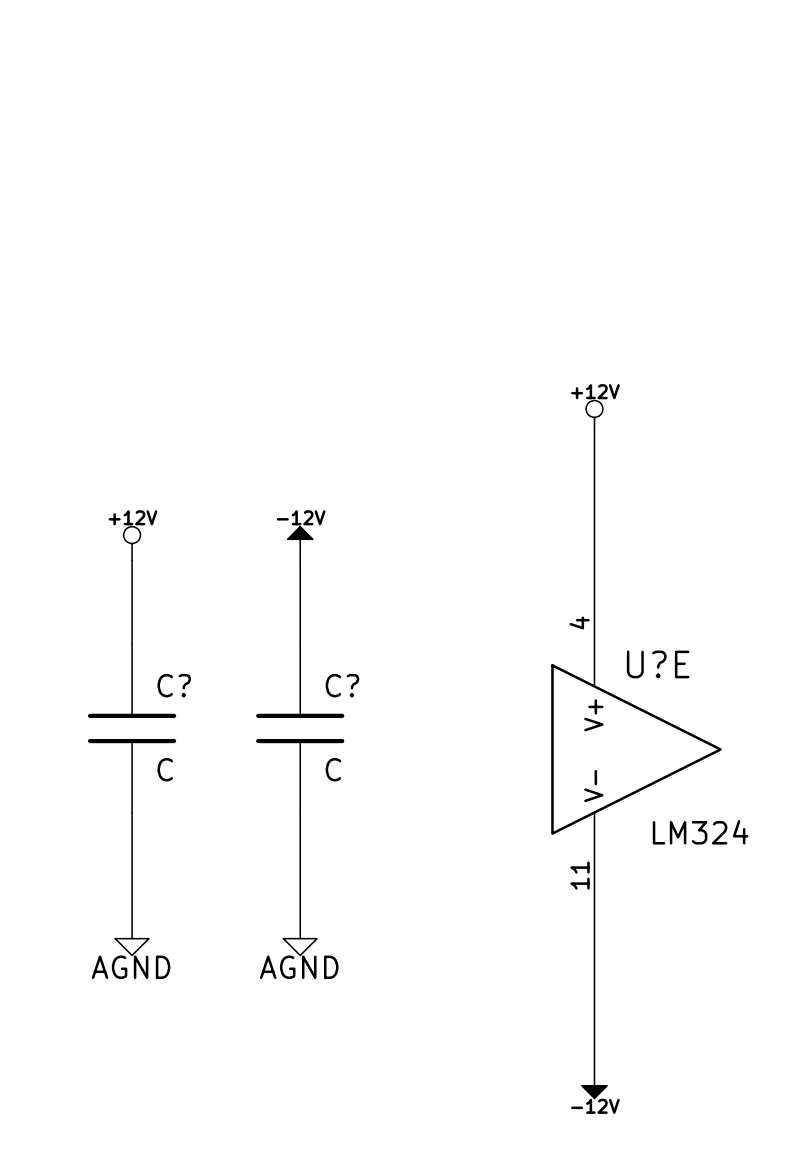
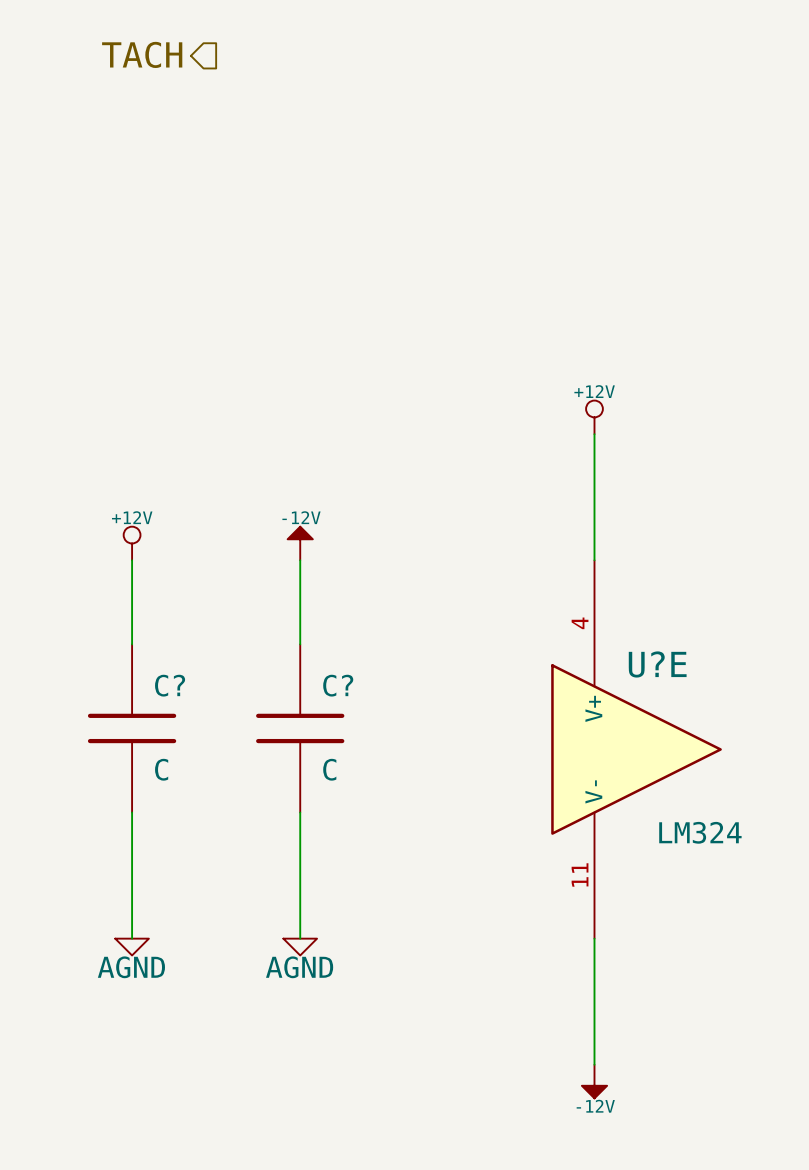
hierarchical label: none -> TACH (142, 54)

